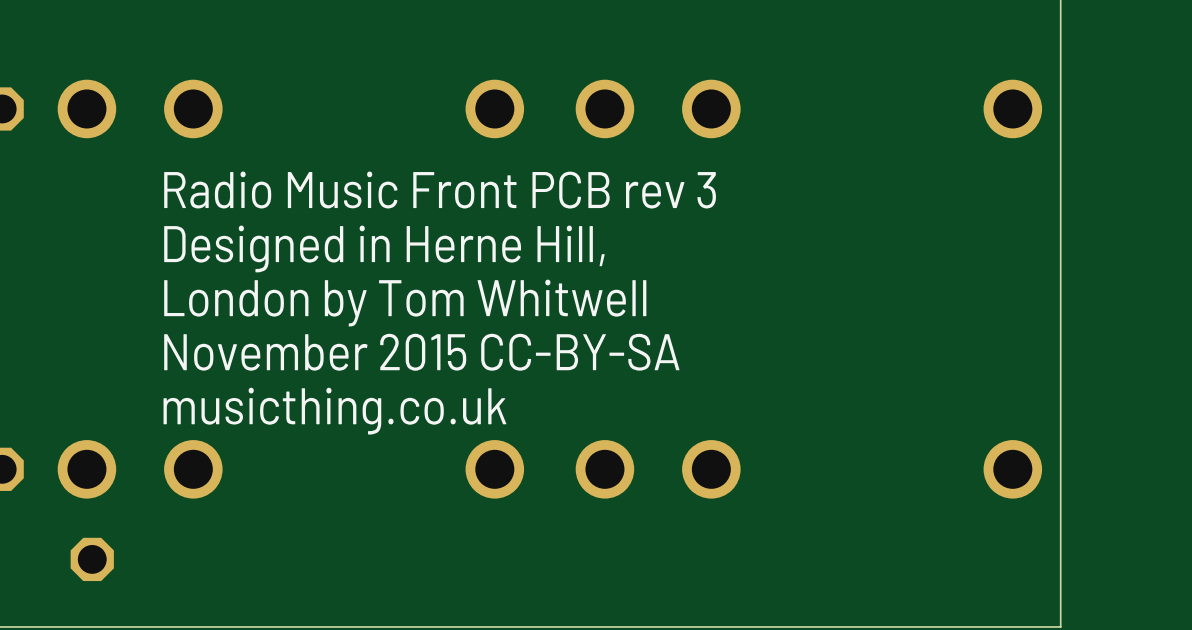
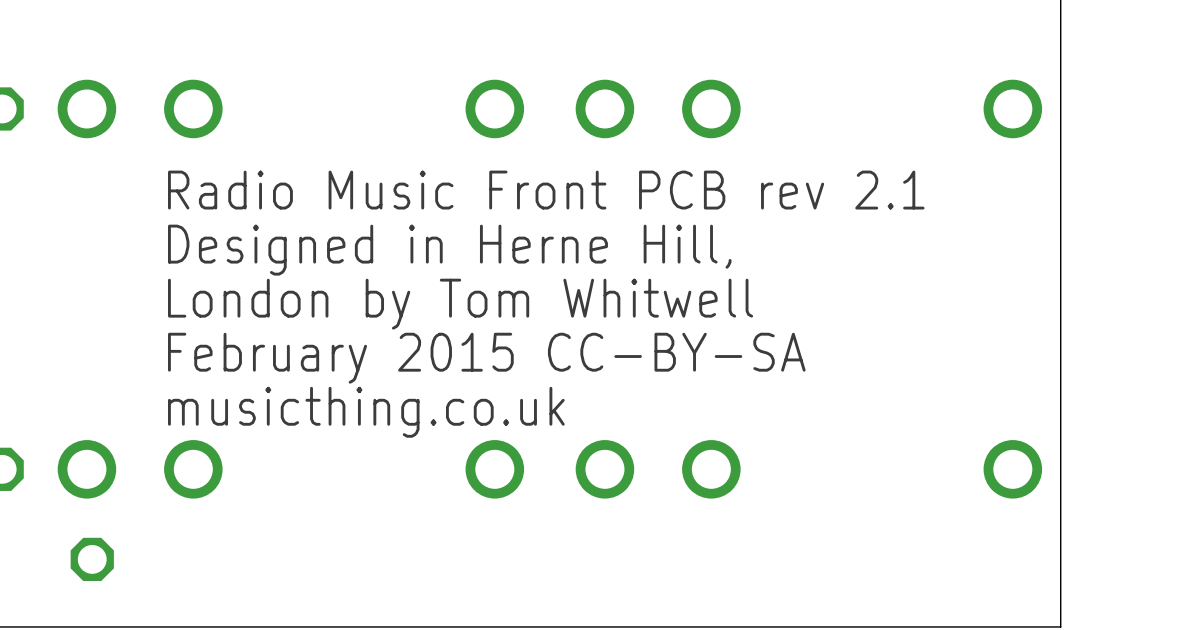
text: Radio Music Front PCB rev 3 (440, 190) -> Radio Music Front PCB rev 2.1 (546, 190)
text: November 2015 CC-BY-SA (421, 352) -> February 2015 CC-BY-SA (486, 358)

